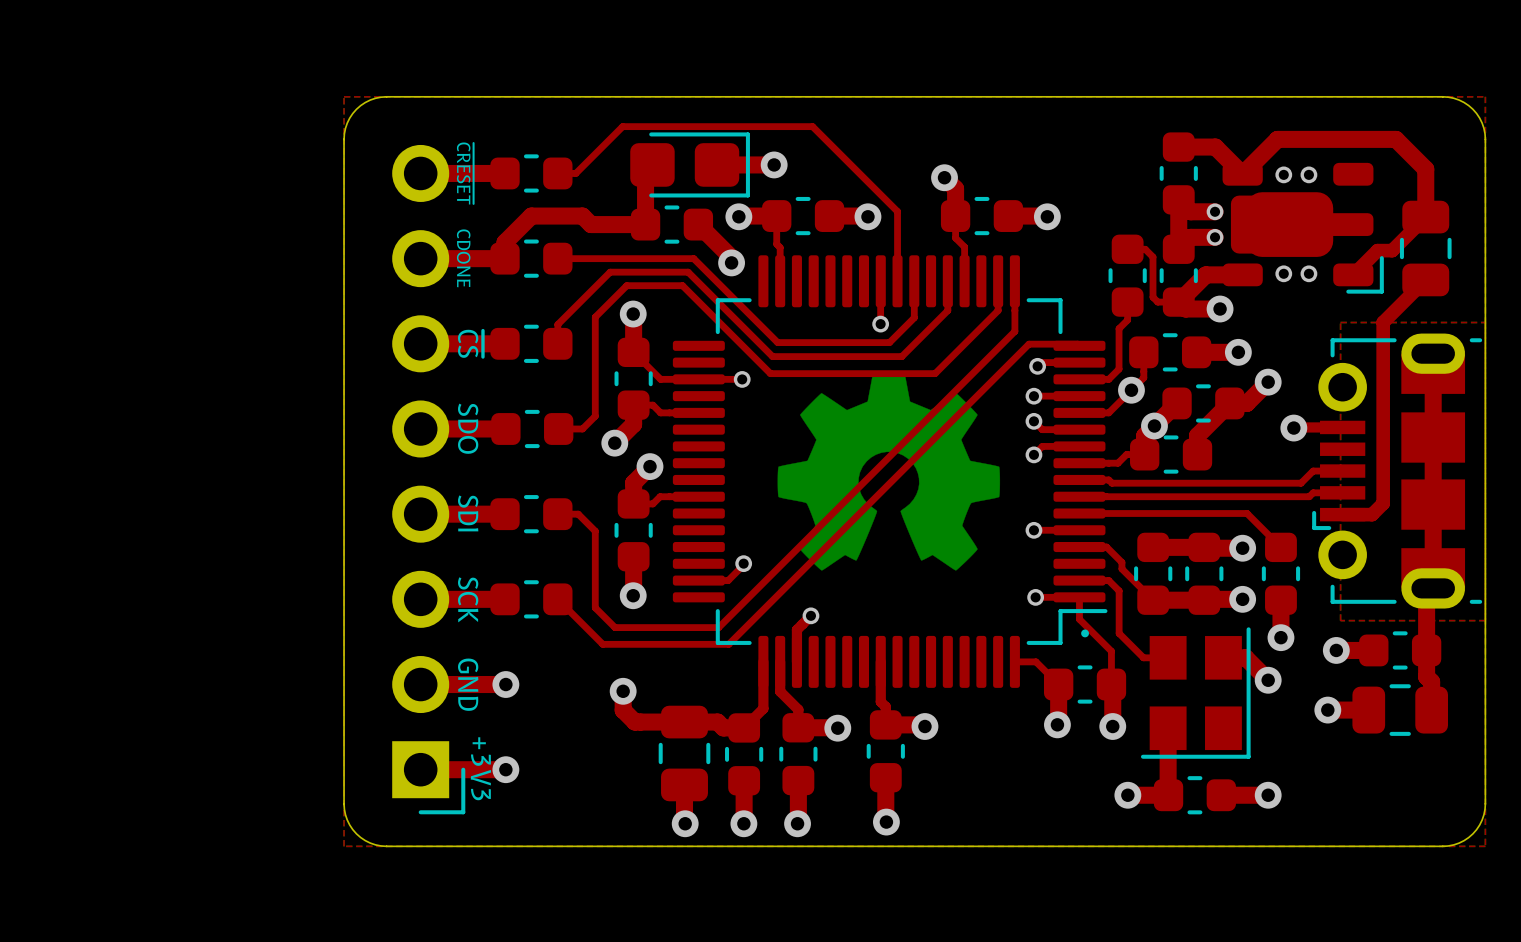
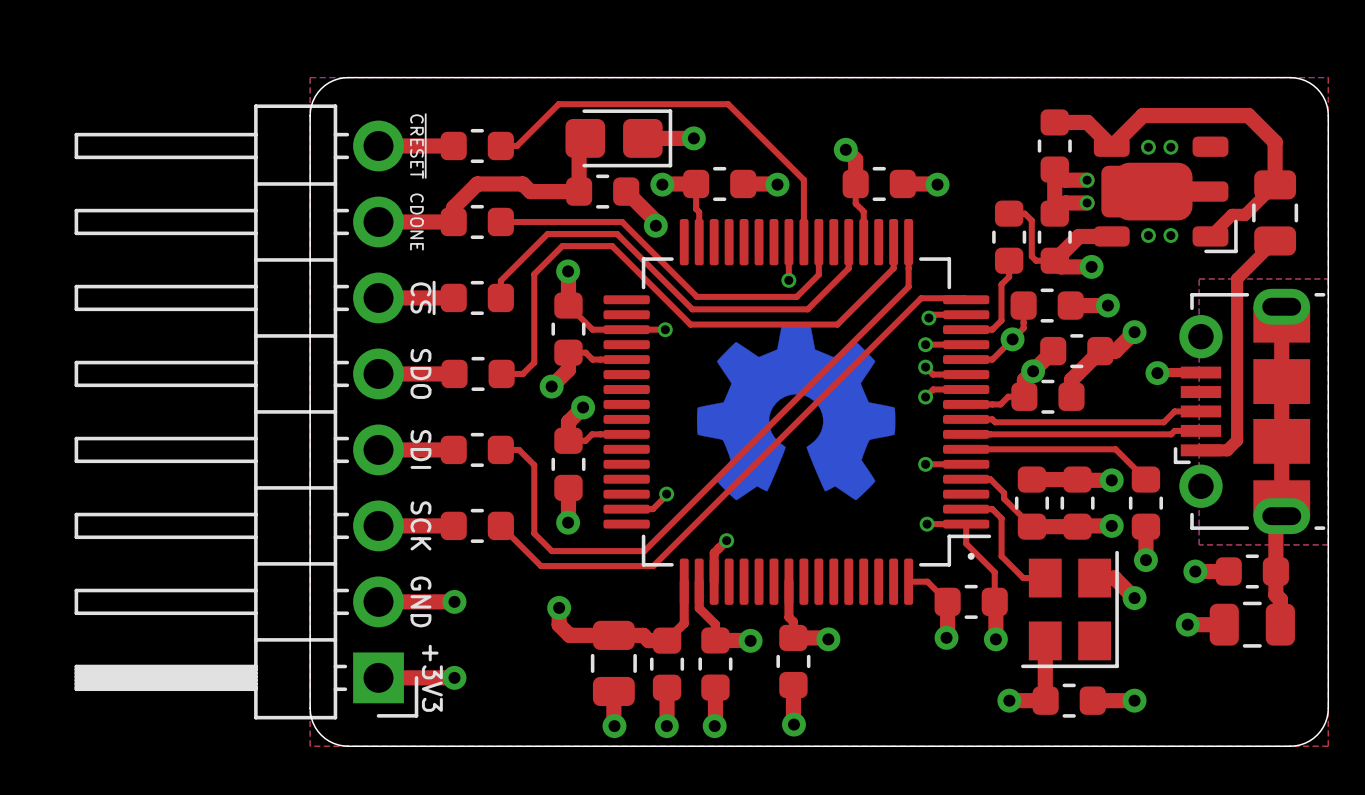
part: none -> (246, 411)

